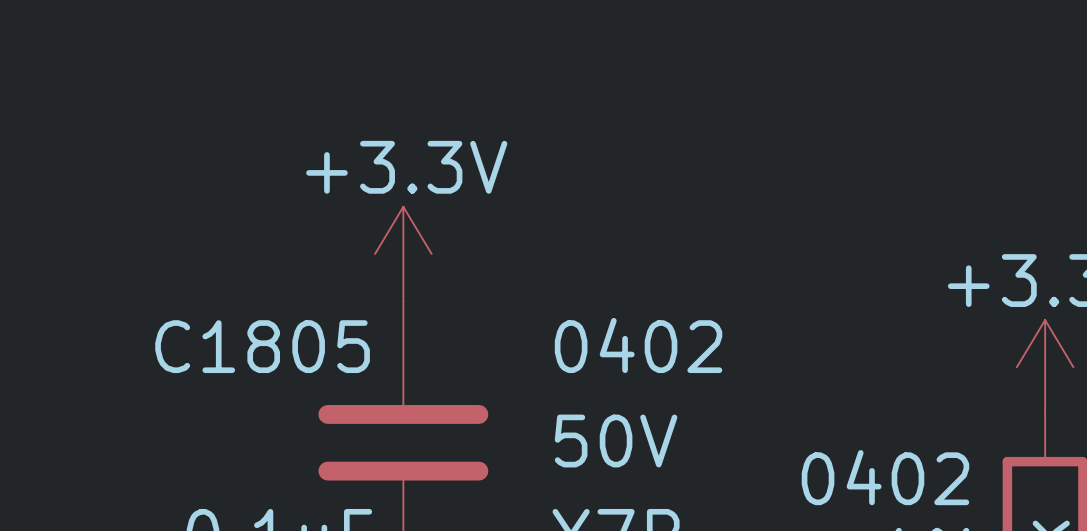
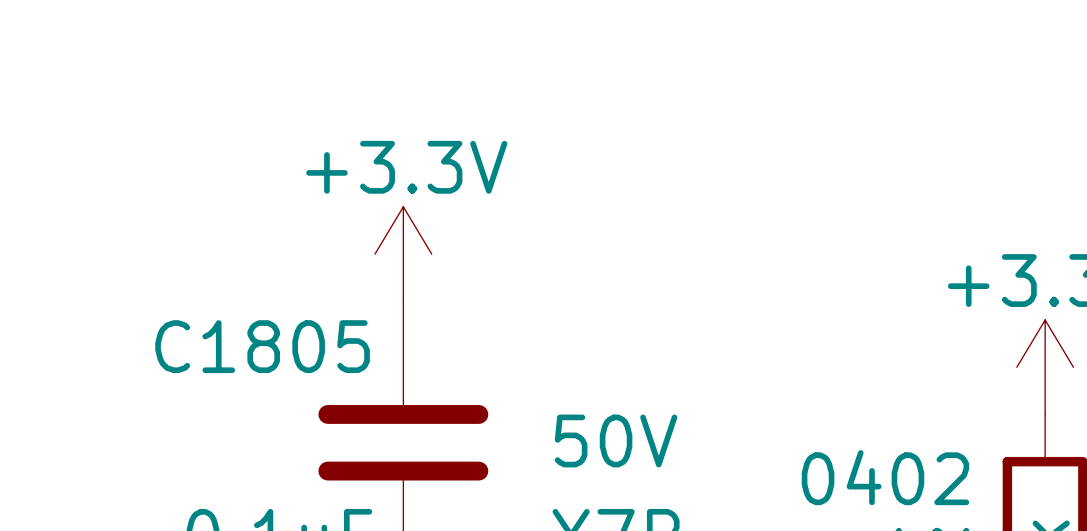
C1805 text: 0402 (638, 345) -> none

